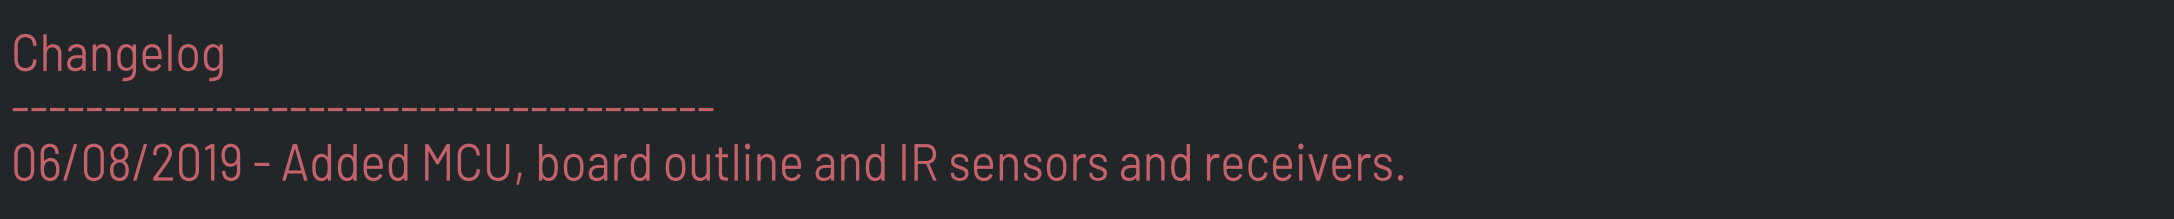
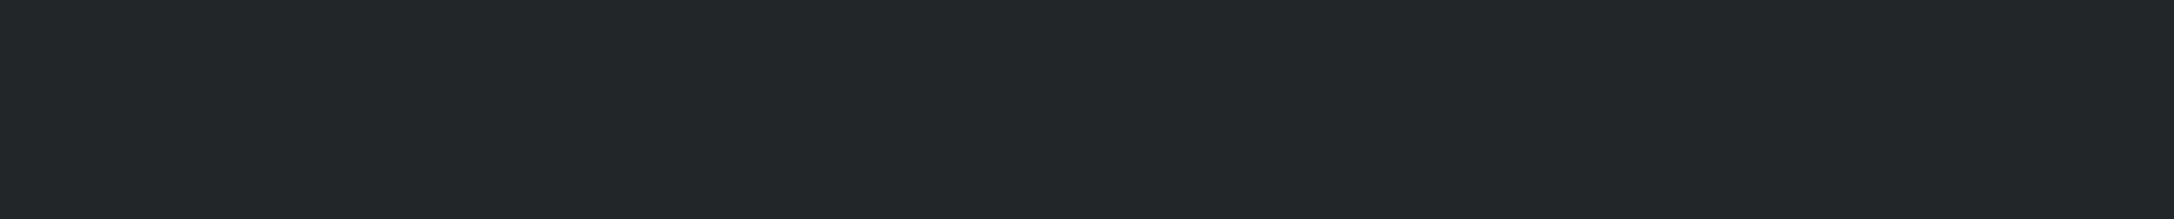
text: Changelog (118, 57) -> none
text: -------------------------------------- (363, 109) -> none
text: 06/08/2019 - Added MCU, board outline and IR sensors and receivers. (708, 164) -> none

